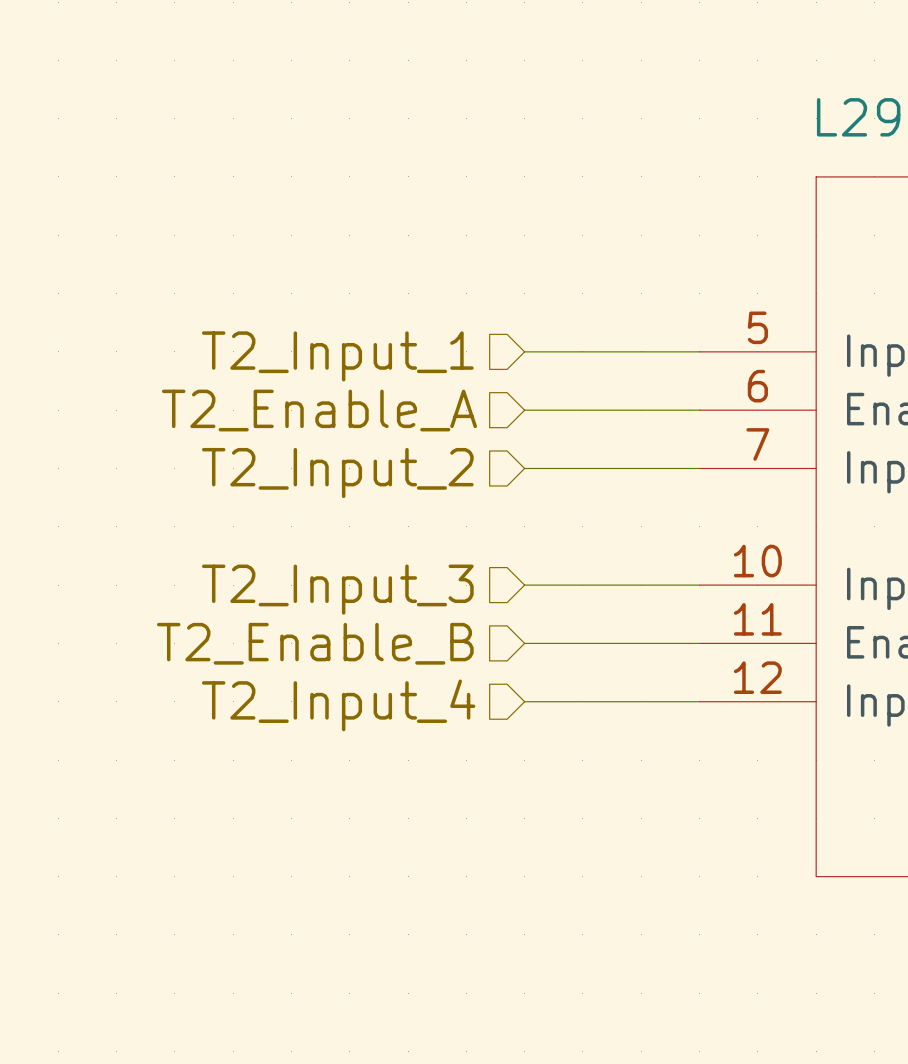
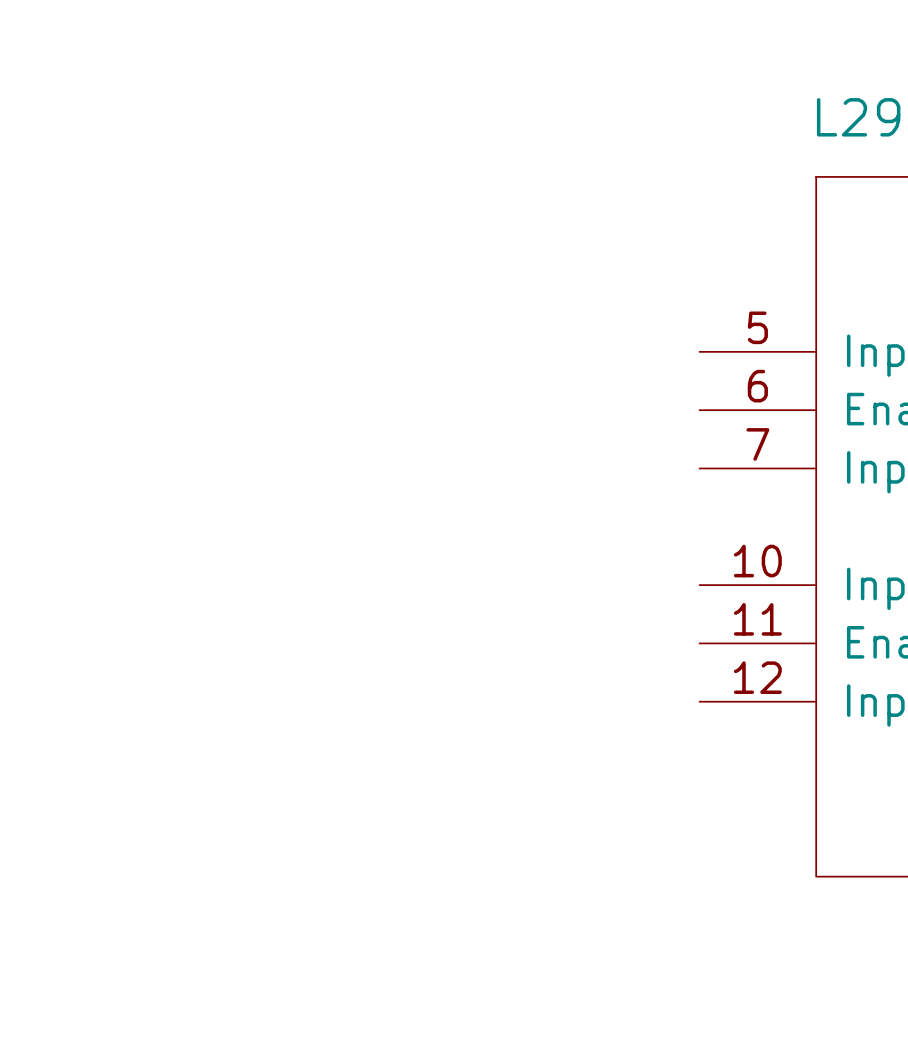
wire: (524, 351) (699, 351) -> none
hierarchical label: T2_Input_1 (337, 356) -> none
hierarchical label: T2_Enable_A (319, 410) -> none
wire: (524, 410) (699, 410) -> none
wire: (524, 468) (699, 468) -> none
hierarchical label: T2_Input_2 (337, 473) -> none
wire: (524, 585) (699, 585) -> none
hierarchical label: T2_Input_3 (337, 589) -> none
hierarchical label: T2_Enable_B (315, 643) -> none
wire: (524, 643) (699, 643) -> none
wire: (524, 701) (699, 701) -> none
hierarchical label: T2_Input_4 (338, 705) -> none

